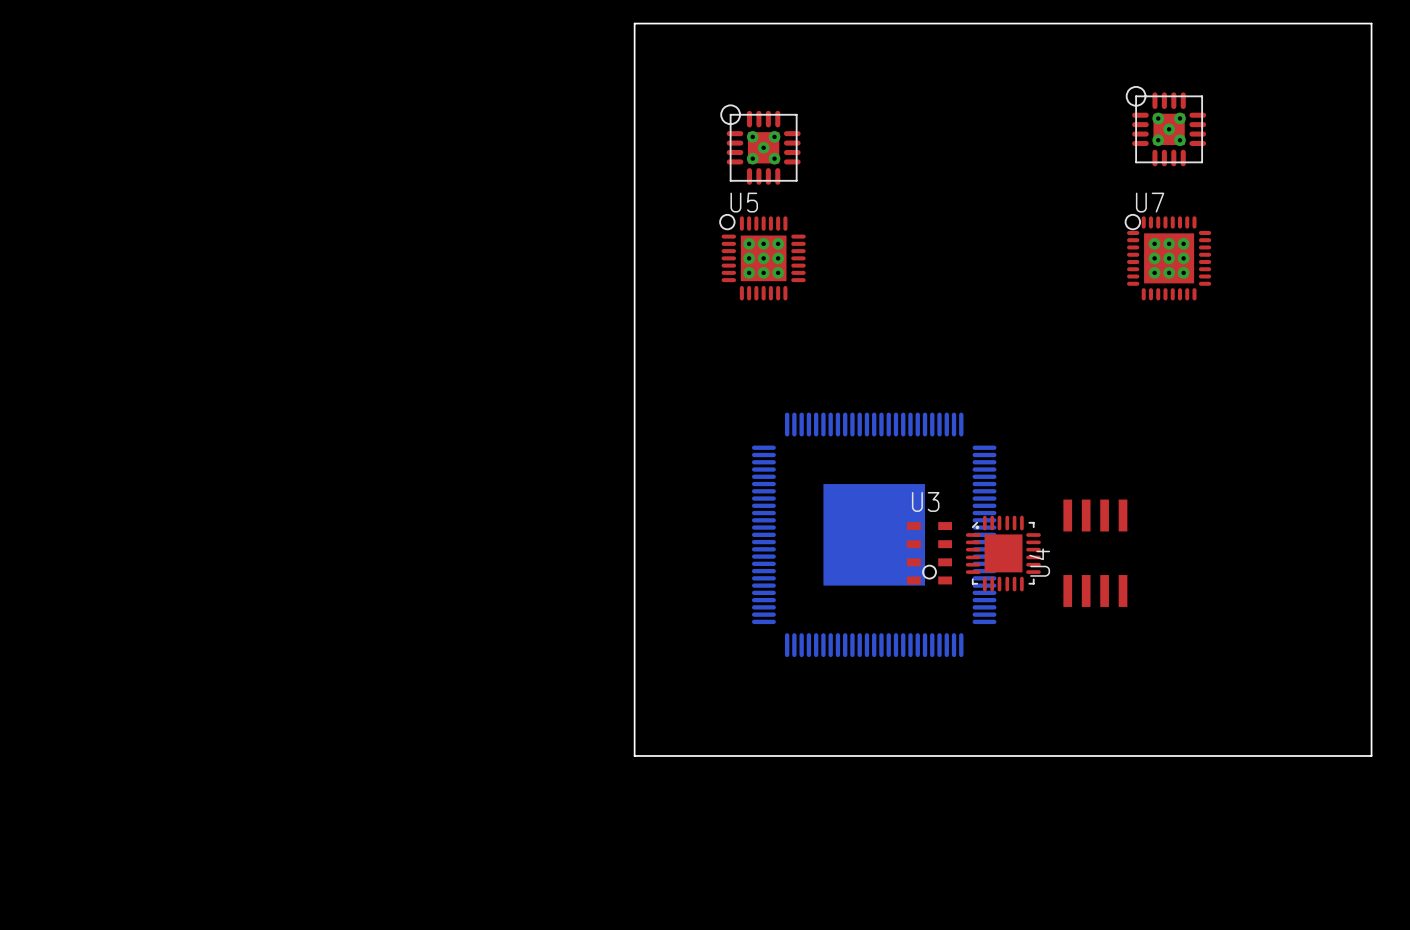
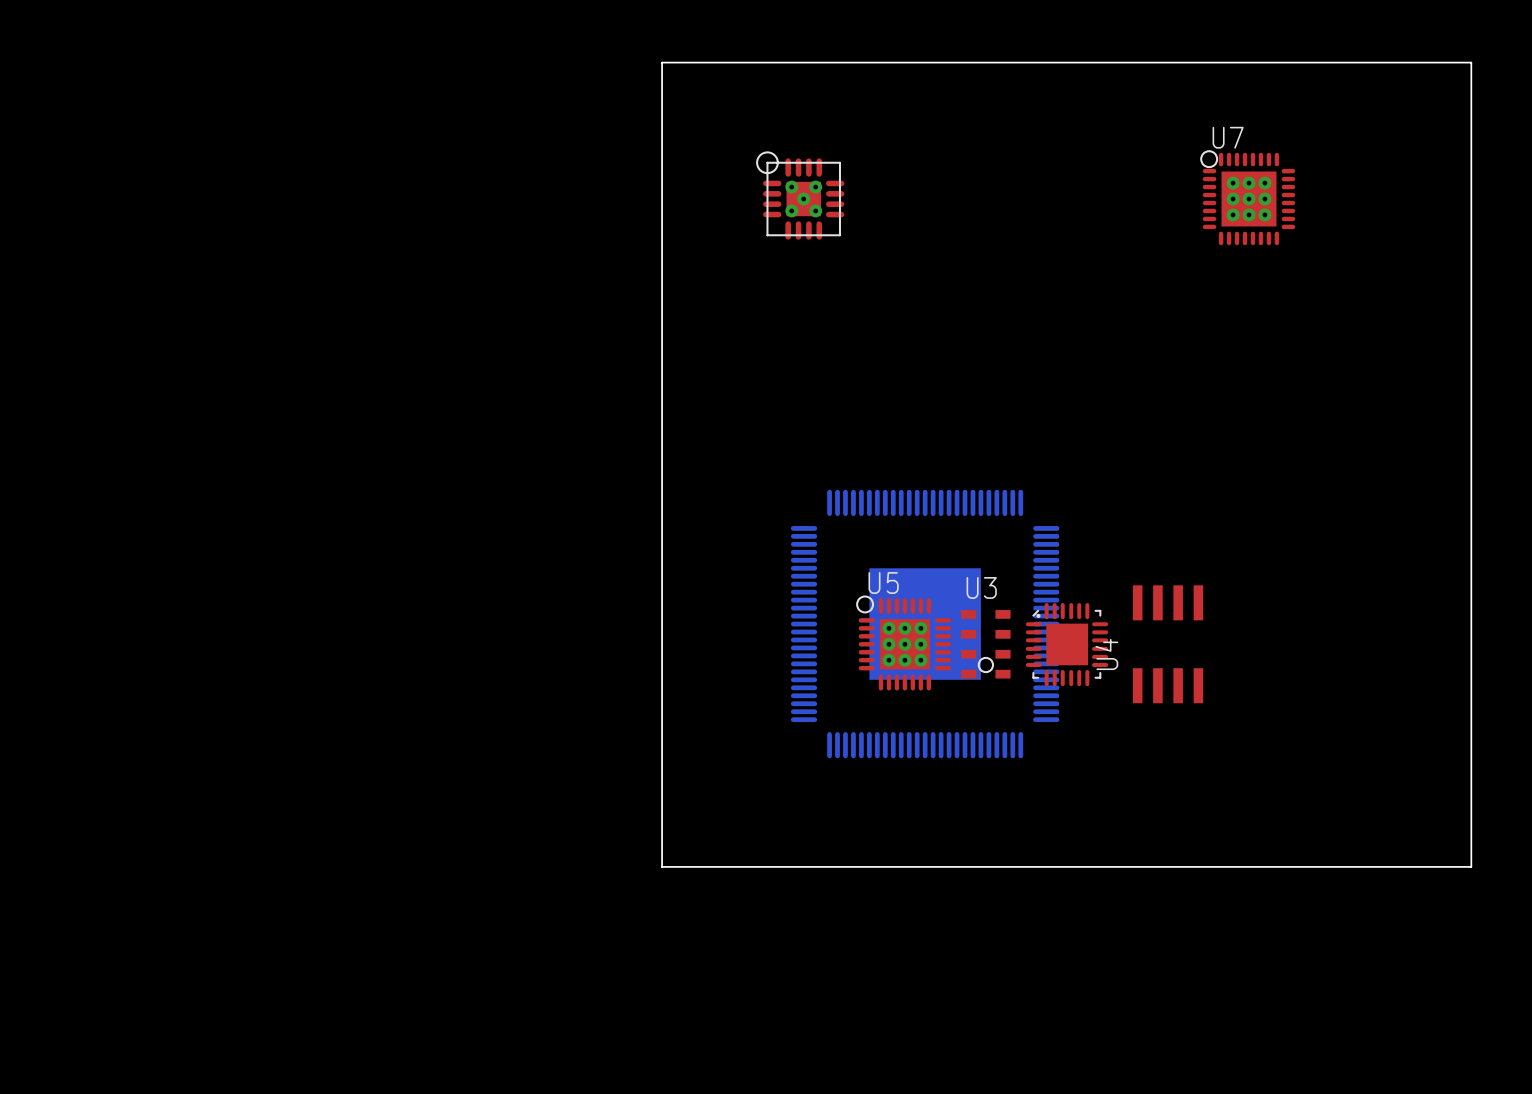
part: (1165, 126) -> none
U5 position: (762, 257) -> (903, 642)
U7 position: (1167, 257) -> (1247, 197)

